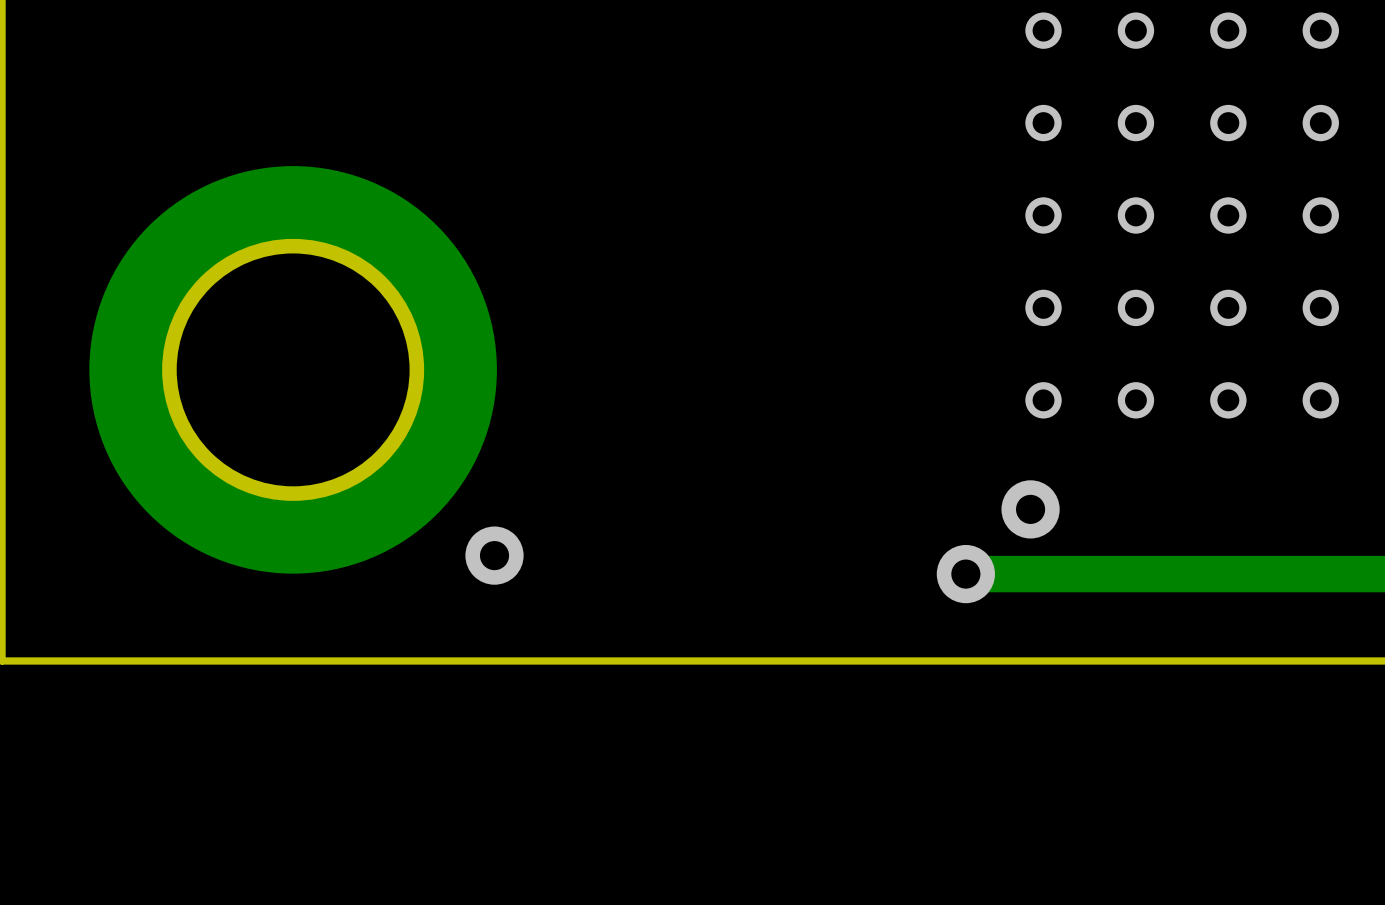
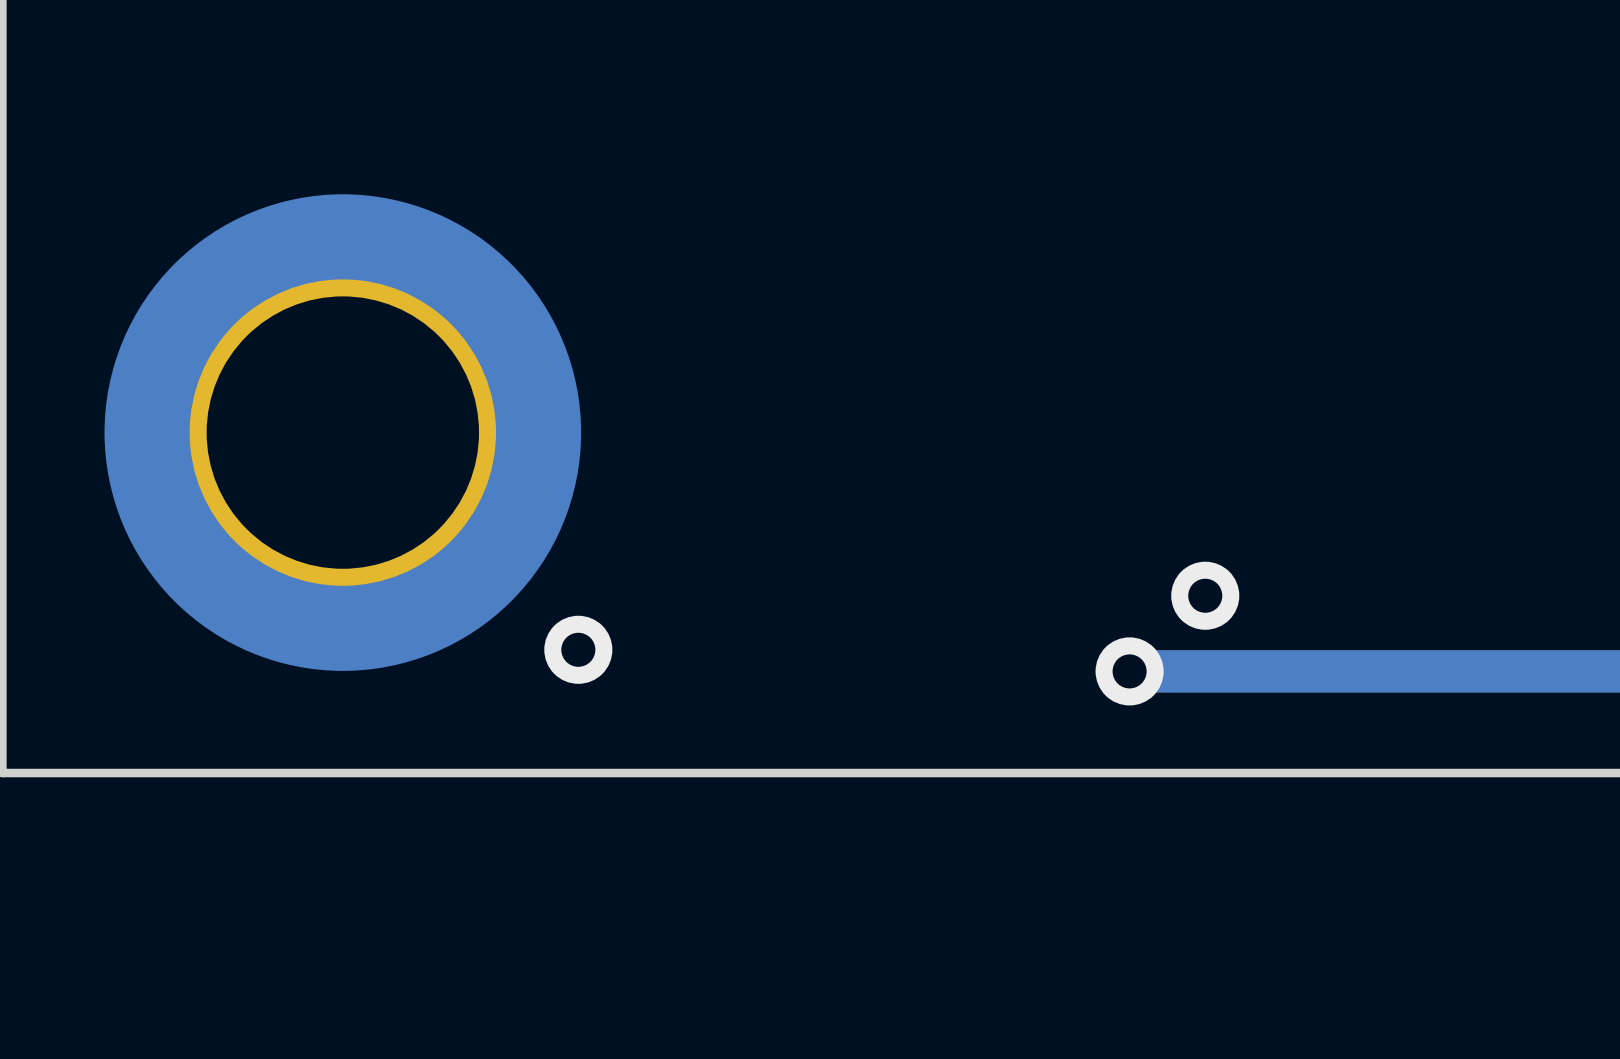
via: (1043, 30) -> none
via: (1135, 30) -> none
via: (1228, 30) -> none
via: (1320, 30) -> none
via: (1043, 123) -> none
via: (1135, 123) -> none
via: (1228, 123) -> none
via: (1320, 123) -> none
via: (1043, 215) -> none
via: (1135, 215) -> none
via: (1228, 215) -> none
via: (1320, 215) -> none
via: (1043, 307) -> none
via: (1135, 307) -> none
via: (1228, 307) -> none
via: (1320, 307) -> none
via: (1043, 400) -> none
via: (1135, 400) -> none
via: (1228, 400) -> none
via: (1320, 400) -> none

